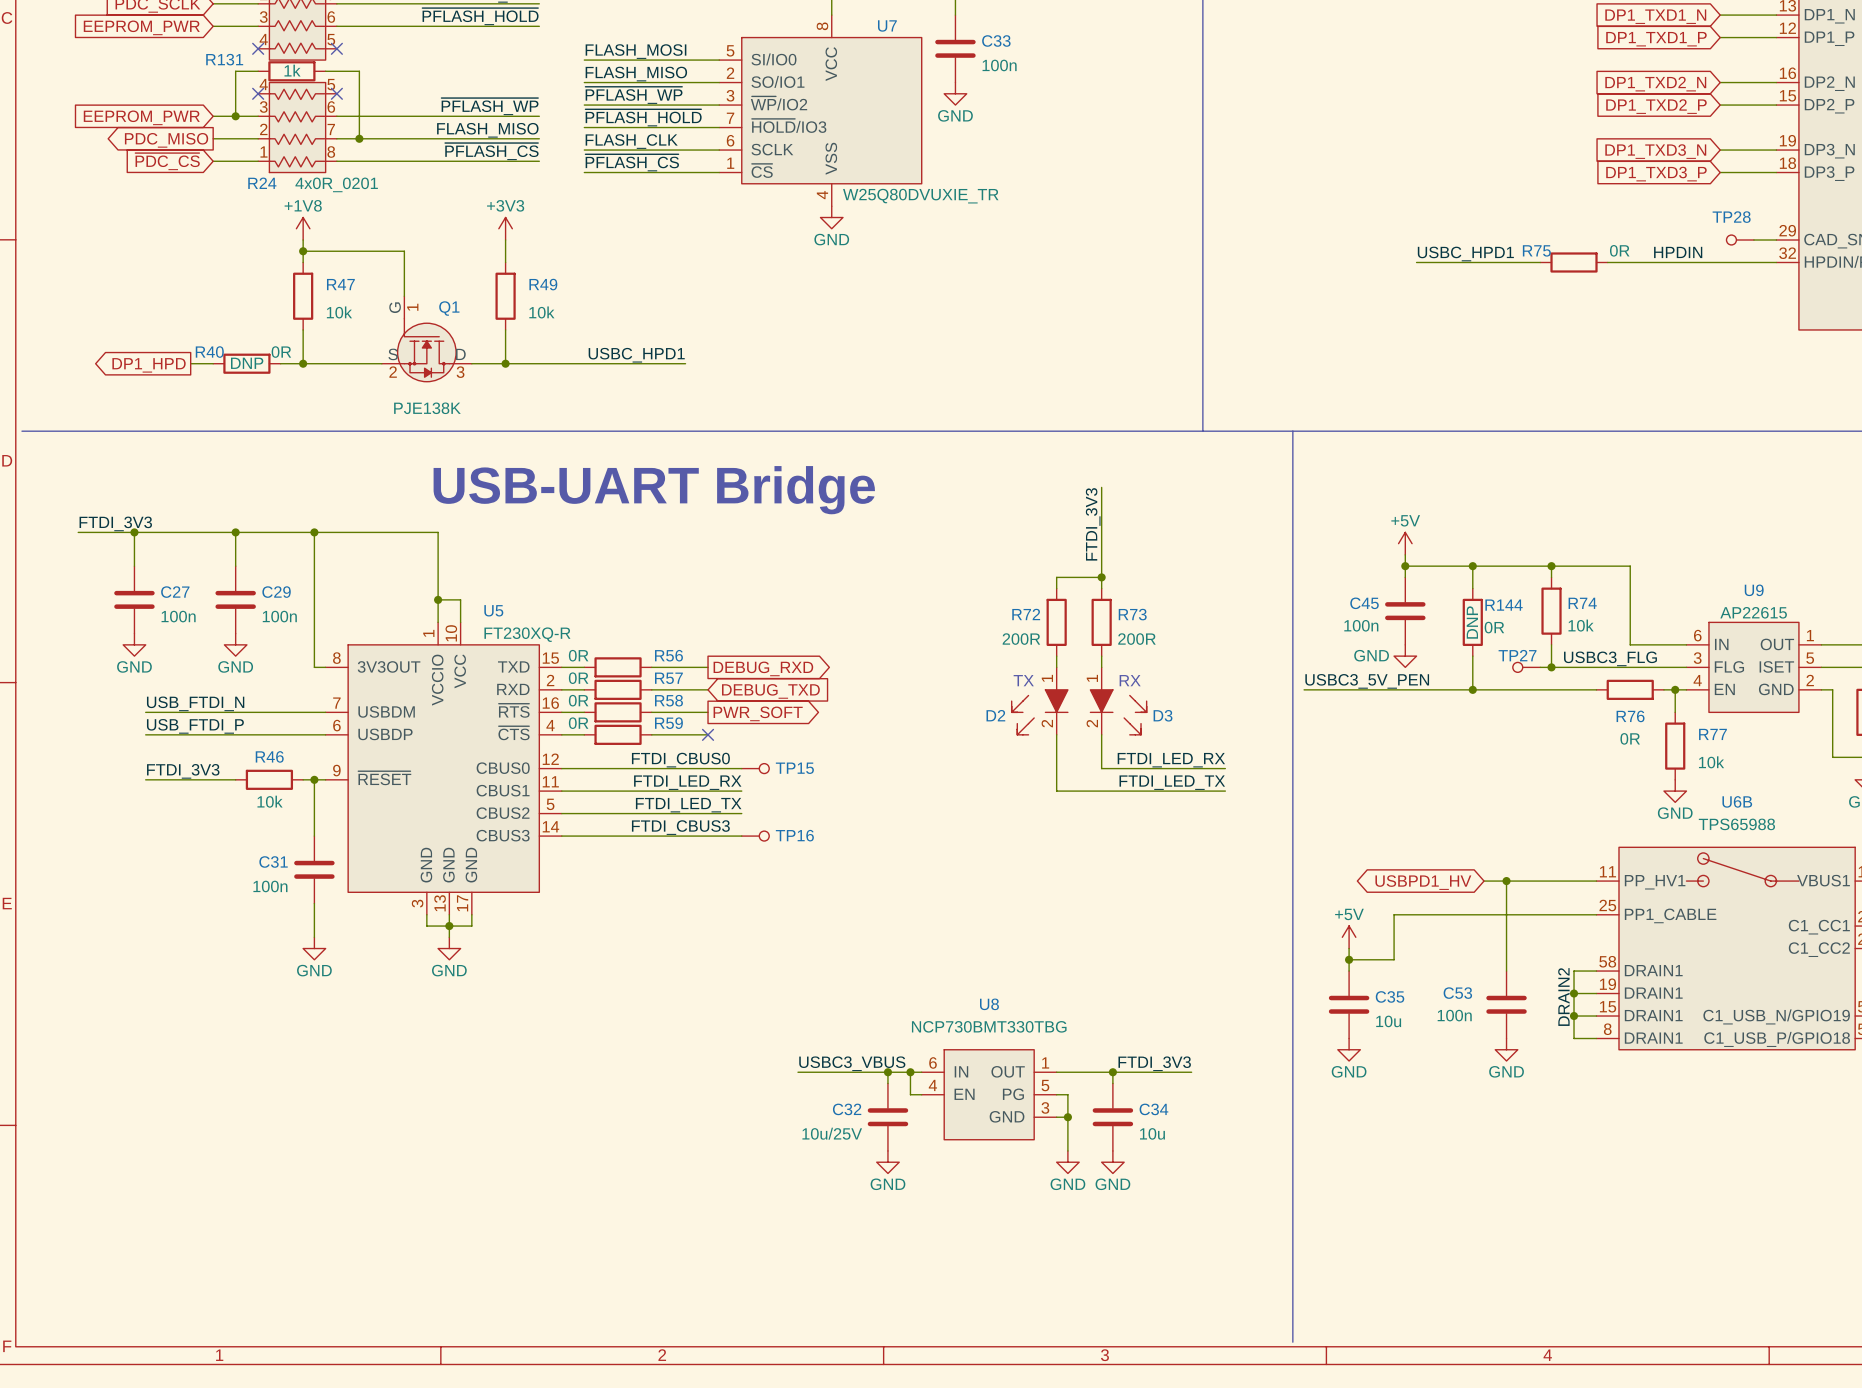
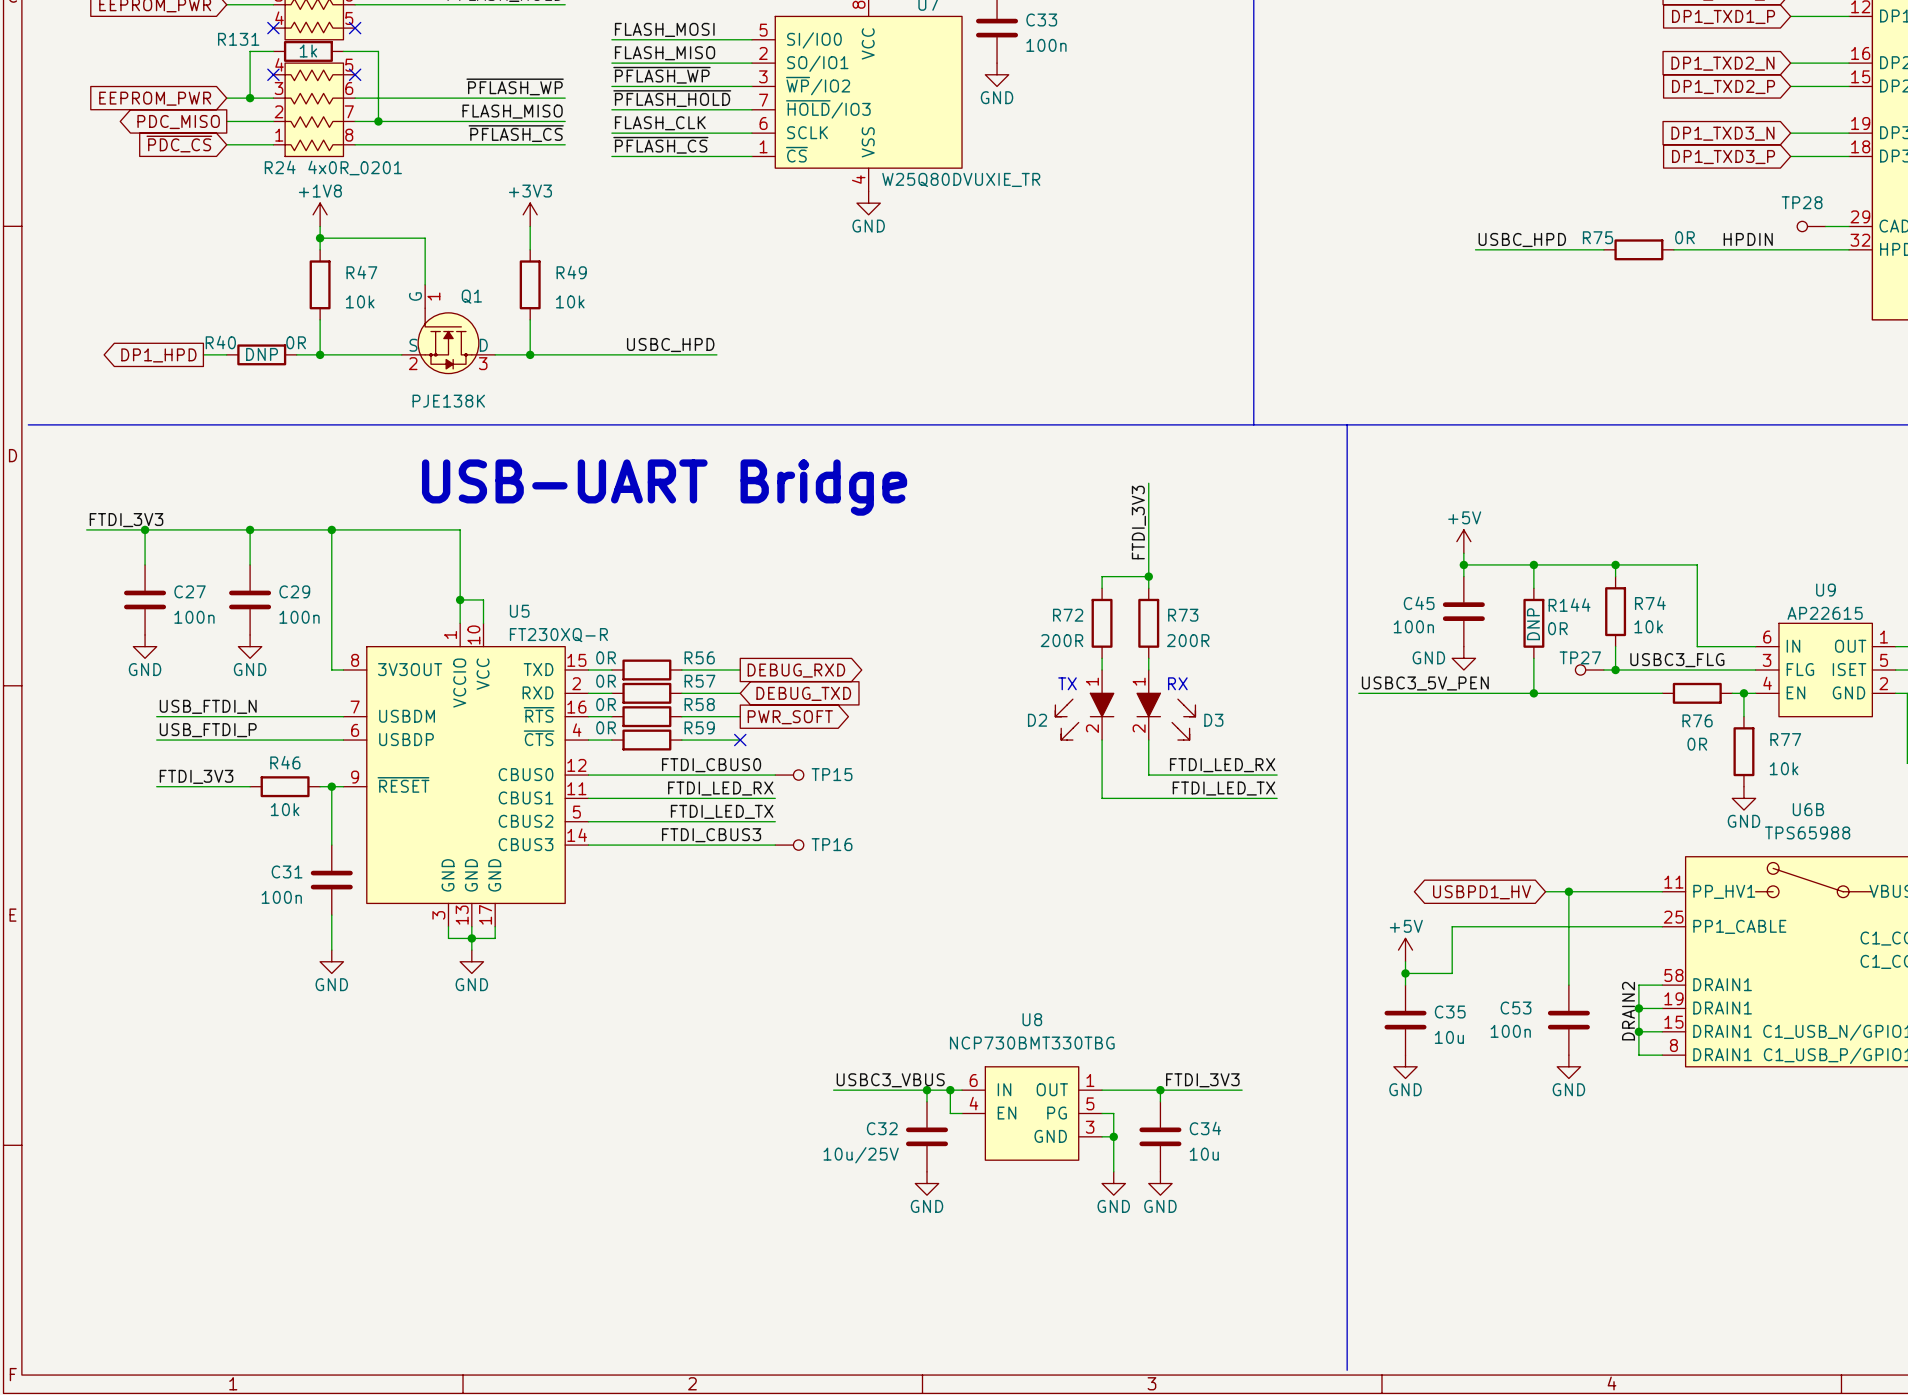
label: USBC_HPD1 (1465, 254) -> USBC_HPD (1522, 239)
label: USBC_HPD1 (636, 355) -> USBC_HPD (670, 345)

